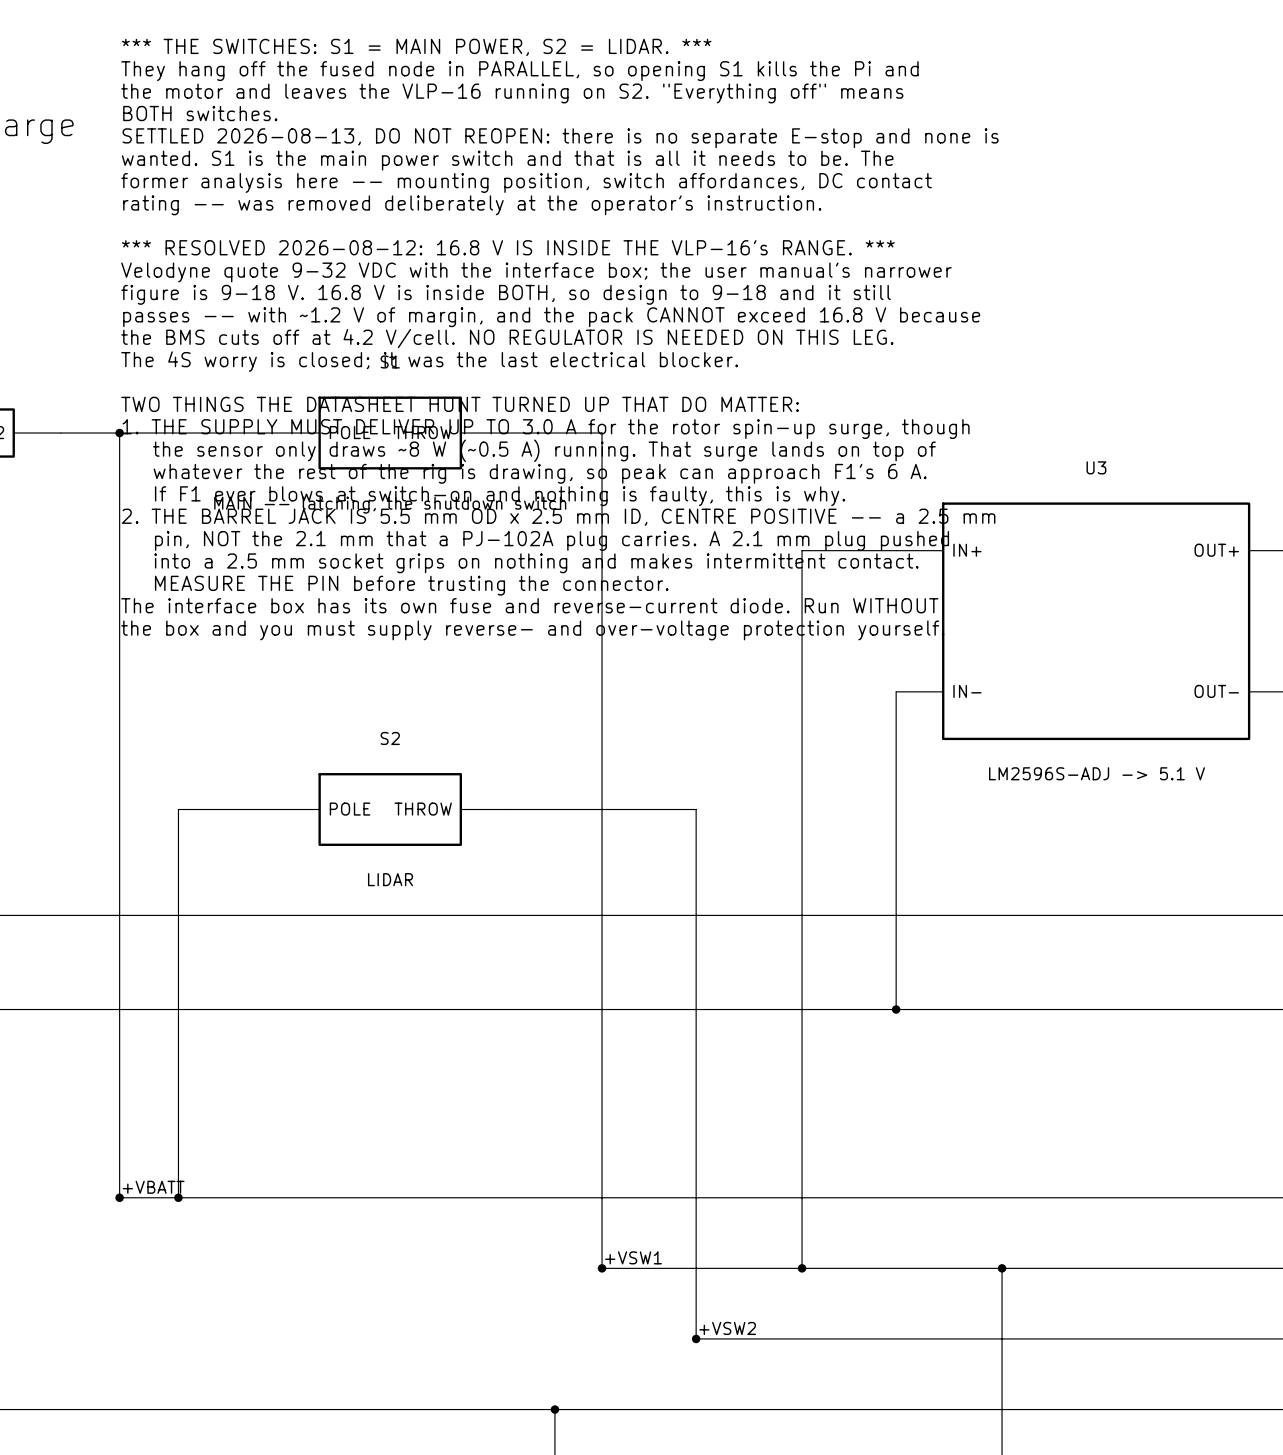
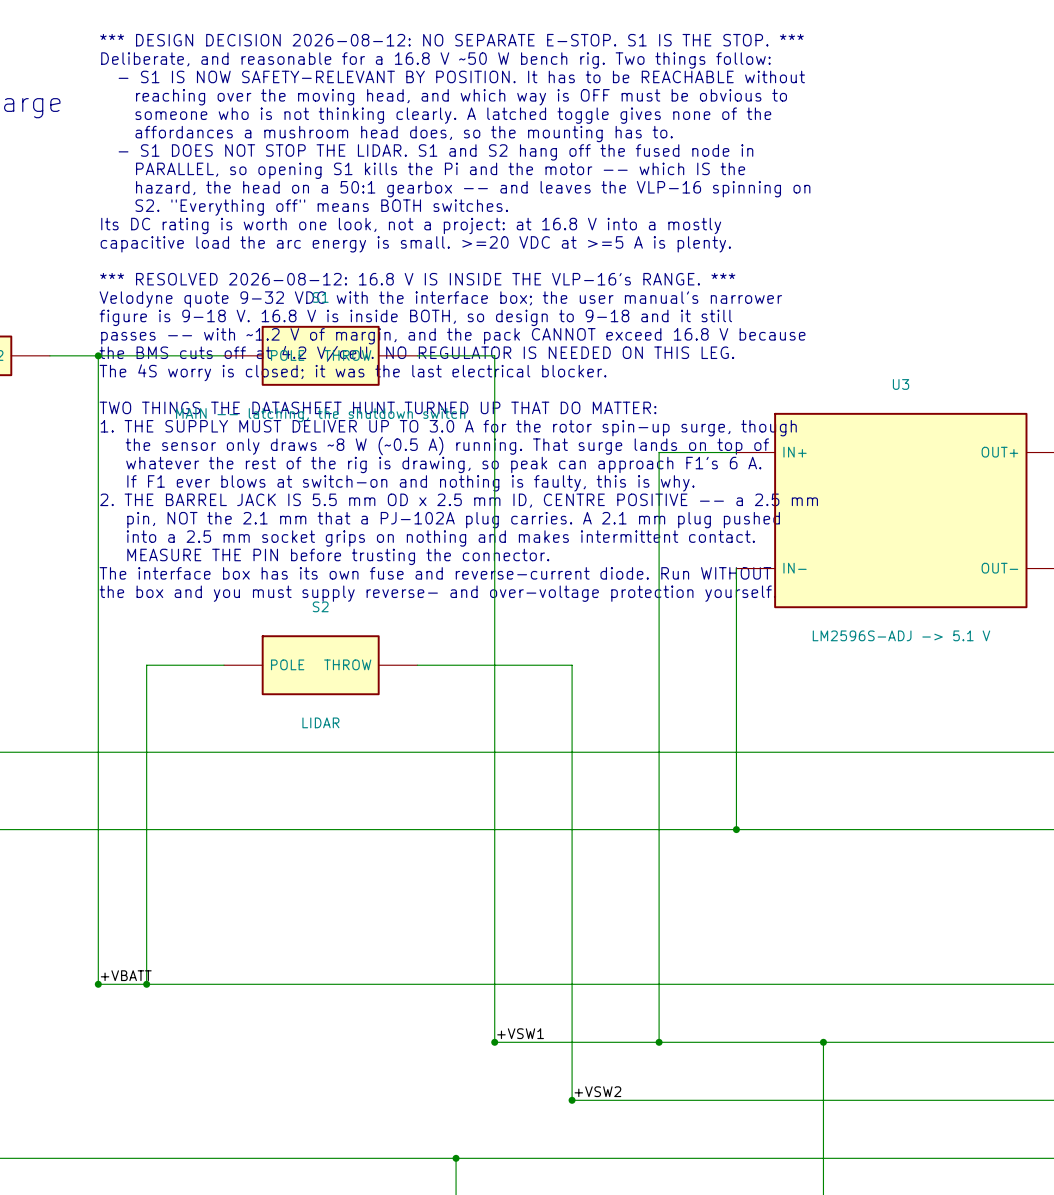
text: *** THE SWITCHES: S1 = MAIN POWER, S2 = LIDAR. *** (416, 47) -> *** DESIGN DECISION 2026-08-12: NO SEPARATE E-STOP. S1 IS THE STOP. *** (451, 40)
text: They hang off the fused node in PARALLEL, so opening S1 kills the Pi and (519, 71) -> Deliberate, and reasonable for a 16.8 V ~50 W bench rig. Two things follow: (435, 60)
text: the motor and leaves the VLP-16 running on S2. "Everything off" means (512, 93) -> - S1 IS NOW SAFETY-RELEVANT BY POSITION. It has to be REACHABLE without (461, 76)
text: BOTH switches. (200, 113) -> reaching over the moving head, and which way is OFF must be obvious to (461, 97)
text: SETTLED 2026-08-13, DO NOT REOPEN: there is no separate E-stop and none is (560, 138) -> someone who is not thinking clearly. A latched toggle gives none of the (453, 115)
text: wanted. S1 is the main power switch and that is all it needs to be. The (507, 160) -> affordances a mushroom head does, so the mounting has to. (404, 134)
text: former analysis here -- mounting position, switch affordances, DC contact (526, 182) -> - S1 DOES NOT STOP THE LIDAR. S1 and S2 hang off the fused node in (435, 152)
text: rating -- was removed deliberately at the operator's instruction. (472, 205) -> PARALLEL, so opening S1 kills the Pi and the motor -- which IS the (440, 170)
text: none -> hazard, the head on a 50:1 gearbox -- and leaves the VLP-16 spinning on (473, 189)
text position: *** RESOLVED 2026-08-12: 16.8 V IS INSIDE THE VLP-16's RANGE. *** (508, 247) -> *** RESOLVED 2026-08-12: 16.8 V IS INSIDE THE VLP-16's RANGE. *** (417, 279)
text: none -> S2. "Everything off" means BOTH switches. (321, 207)
text position: Velodyne quote 9-32 VDC with the interface box; the user manual's narrower (536, 272) -> Velodyne quote 9-32 VDC with the interface box; the user manual's narrower (440, 299)
text: none -> Its DC rating is worth one look, not a project: at 16.8 V into a mostly (411, 225)
text position: figure is 9-18 V. 16.8 V is inside BOTH, so design to 9-18 and it still (506, 294) -> figure is 9-18 V. 16.8 V is inside BOTH, so design to 9-18 and it still (415, 317)
text: none -> capacitive load the arc energy is small. >=20 VDC at >=5 A is plenty. (415, 244)
text position: passes -- with ~1.2 V of margin, and the pack CANNOT exceed 16.8 V because (551, 317) -> passes -- with ~1.2 V of margin, and the pack CANNOT exceed 16.8 V because (453, 336)
text position: the BMS cuts off at 4.2 V/cell. NO REGULATOR IS NEEDED ON THIS LEG. (507, 338) -> the BMS cuts off at 4.2 V/cell. NO REGULATOR IS NEEDED ON THIS LEG. (416, 353)
text position: The 4S worry is closed; it was the last electrical blocker. (429, 361) -> The 4S worry is closed; it was the last electrical blocker. (353, 372)
text position: TWO THINGS THE DATASHEET HUNT TURNED UP THAT DO MATTER: (460, 404) -> TWO THINGS THE DATASHEET HUNT TURNED UP THAT DO MATTER: (378, 407)
text position: 1. THE SUPPLY MUST DELIVER UP TO 3.0 A for the rotor spin-up surge, though (546, 429) -> 1. THE SUPPLY MUST DELIVER UP TO 3.0 A for the rotor spin-up surge, though (448, 428)
text position: the sensor only draws ~8 W (~0.5 A) running. That surge lands on top of (544, 450) -> the sensor only draws ~8 W (~0.5 A) running. That surge lands on top of (447, 446)
text position: whatever the rest of the rig is drawing, so peak can approach F1's 6 A. (540, 473) -> whatever the rest of the rig is drawing, so peak can approach F1's 6 A. (443, 464)
text position: If F1 ever blows at switch-on and nothing is faulty, this is why. (500, 496) -> If F1 ever blows at switch-on and nothing is faulty, this is why. (410, 483)
text position: 2. THE BARREL JACK IS 5.5 mm OD x 2.5 mm ID, CENTRE POSITIVE -- a 2.5 mm (558, 517) -> 2. THE BARREL JACK IS 5.5 mm OD x 2.5 mm ID, CENTRE POSITIVE -- a 2.5 mm (459, 500)
text position: pin, NOT the 2.1 mm that a PJ-102A plug carries. A 2.1 mm plug pushed (552, 540) -> pin, NOT the 2.1 mm that a PJ-102A plug carries. A 2.1 mm plug pushed (453, 520)
text position: into a 2.5 mm socket grips on nothing and makes intermittent contact. (536, 563) -> into a 2.5 mm socket grips on nothing and makes intermittent contact. (440, 538)
text position: MEASURE THE PIN before trusting the connector. (411, 585) -> MEASURE THE PIN before trusting the connector. (338, 556)
text position: The interface box has its own fuse and reverse-current diode. Run WITHOUT (529, 605) -> The interface box has its own fuse and reverse-current diode. Run WITHOUT (435, 573)
text position: the box and you must supply reverse- and over-voltage protection yourself. (532, 630) -> the box and you must supply reverse- and over-voltage protection yourself. (437, 593)

